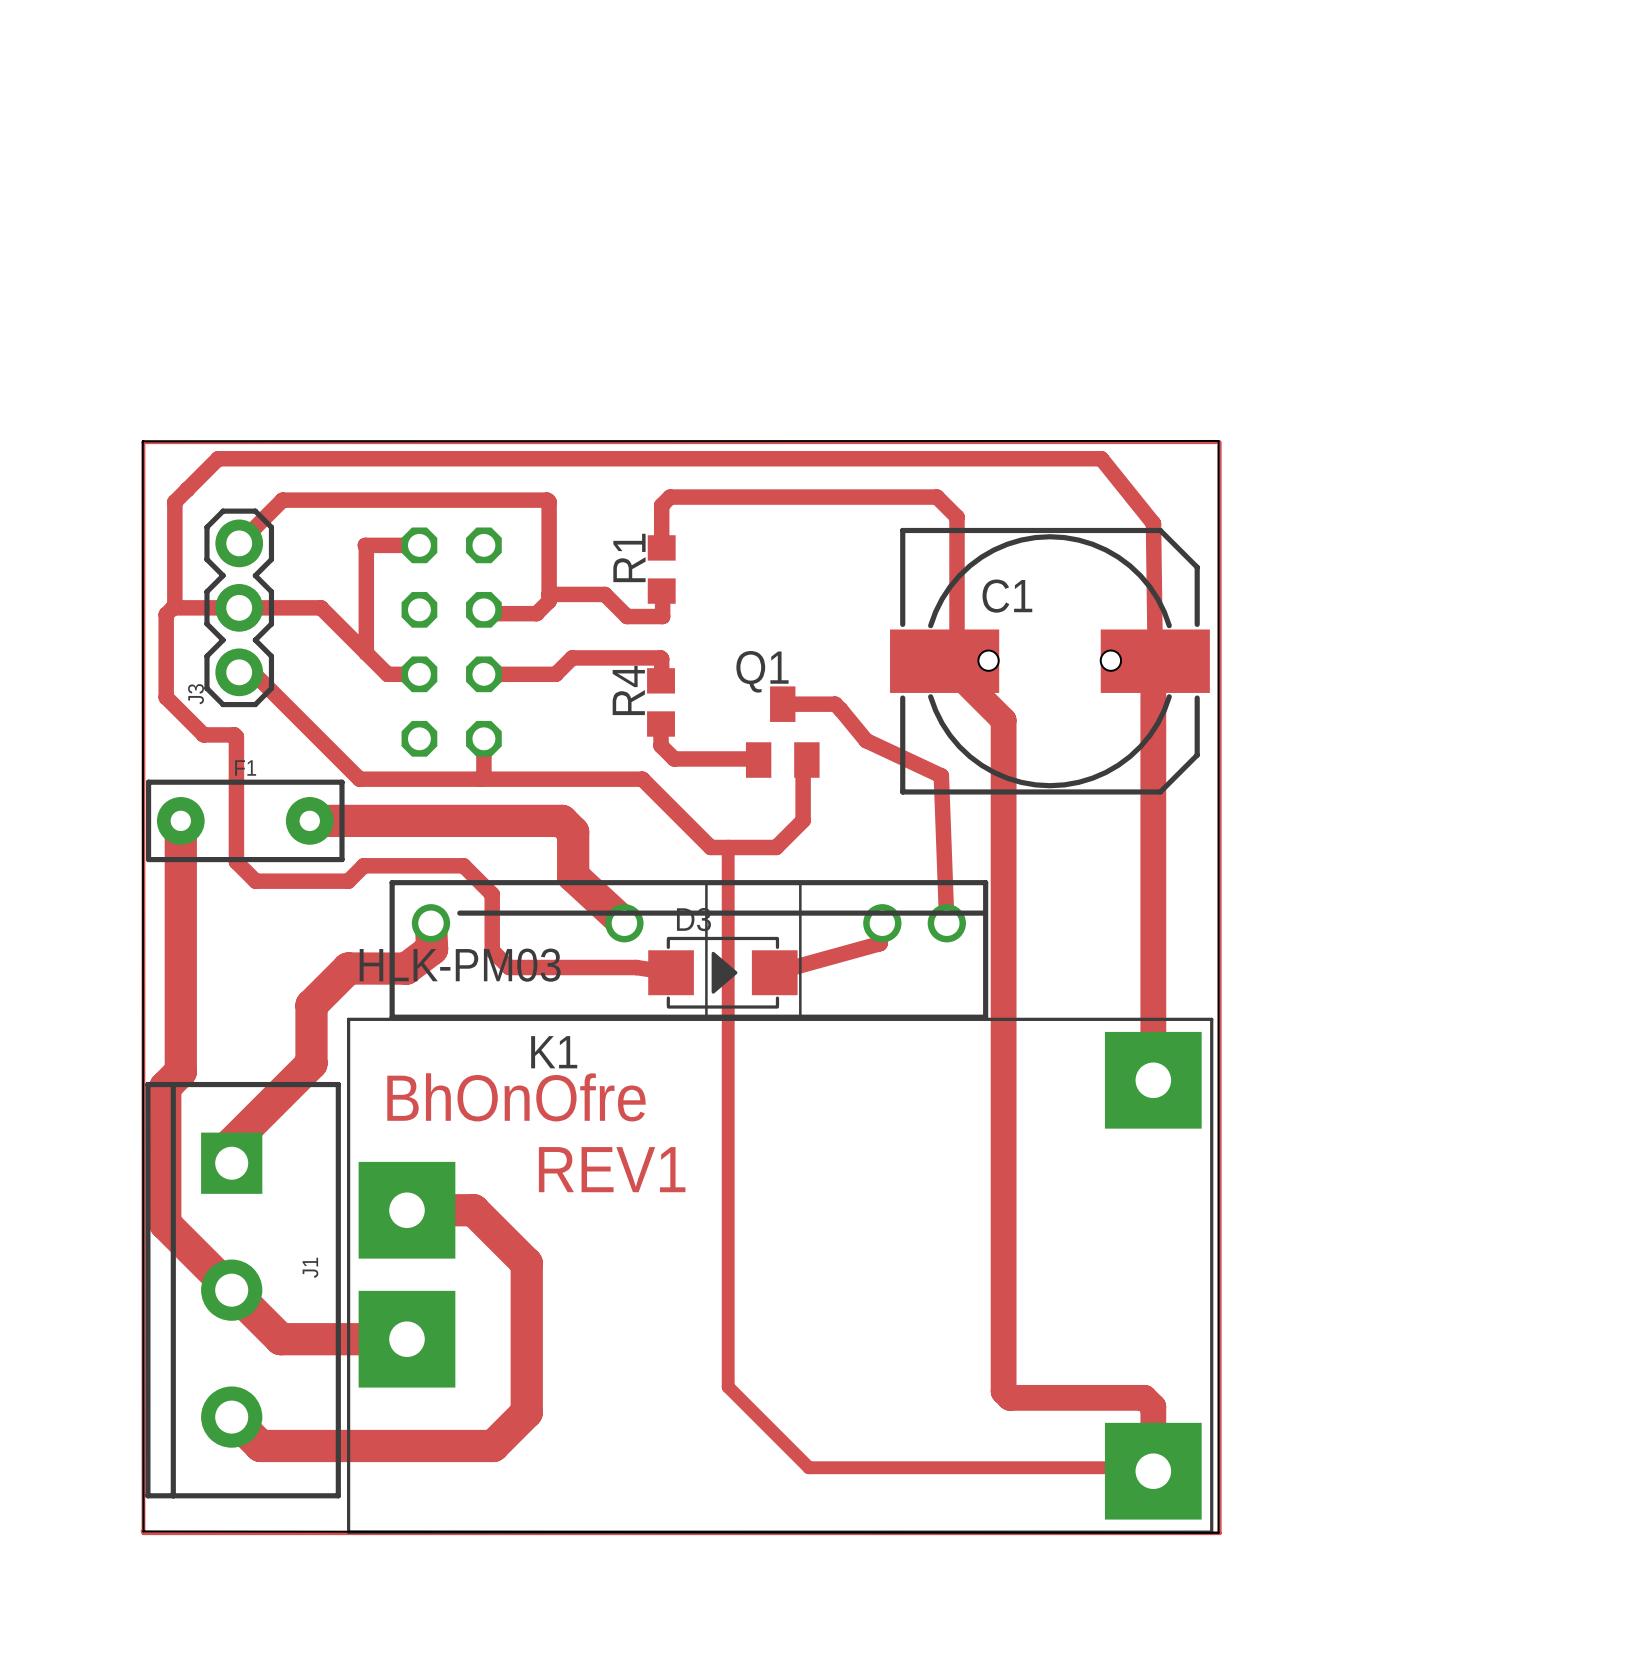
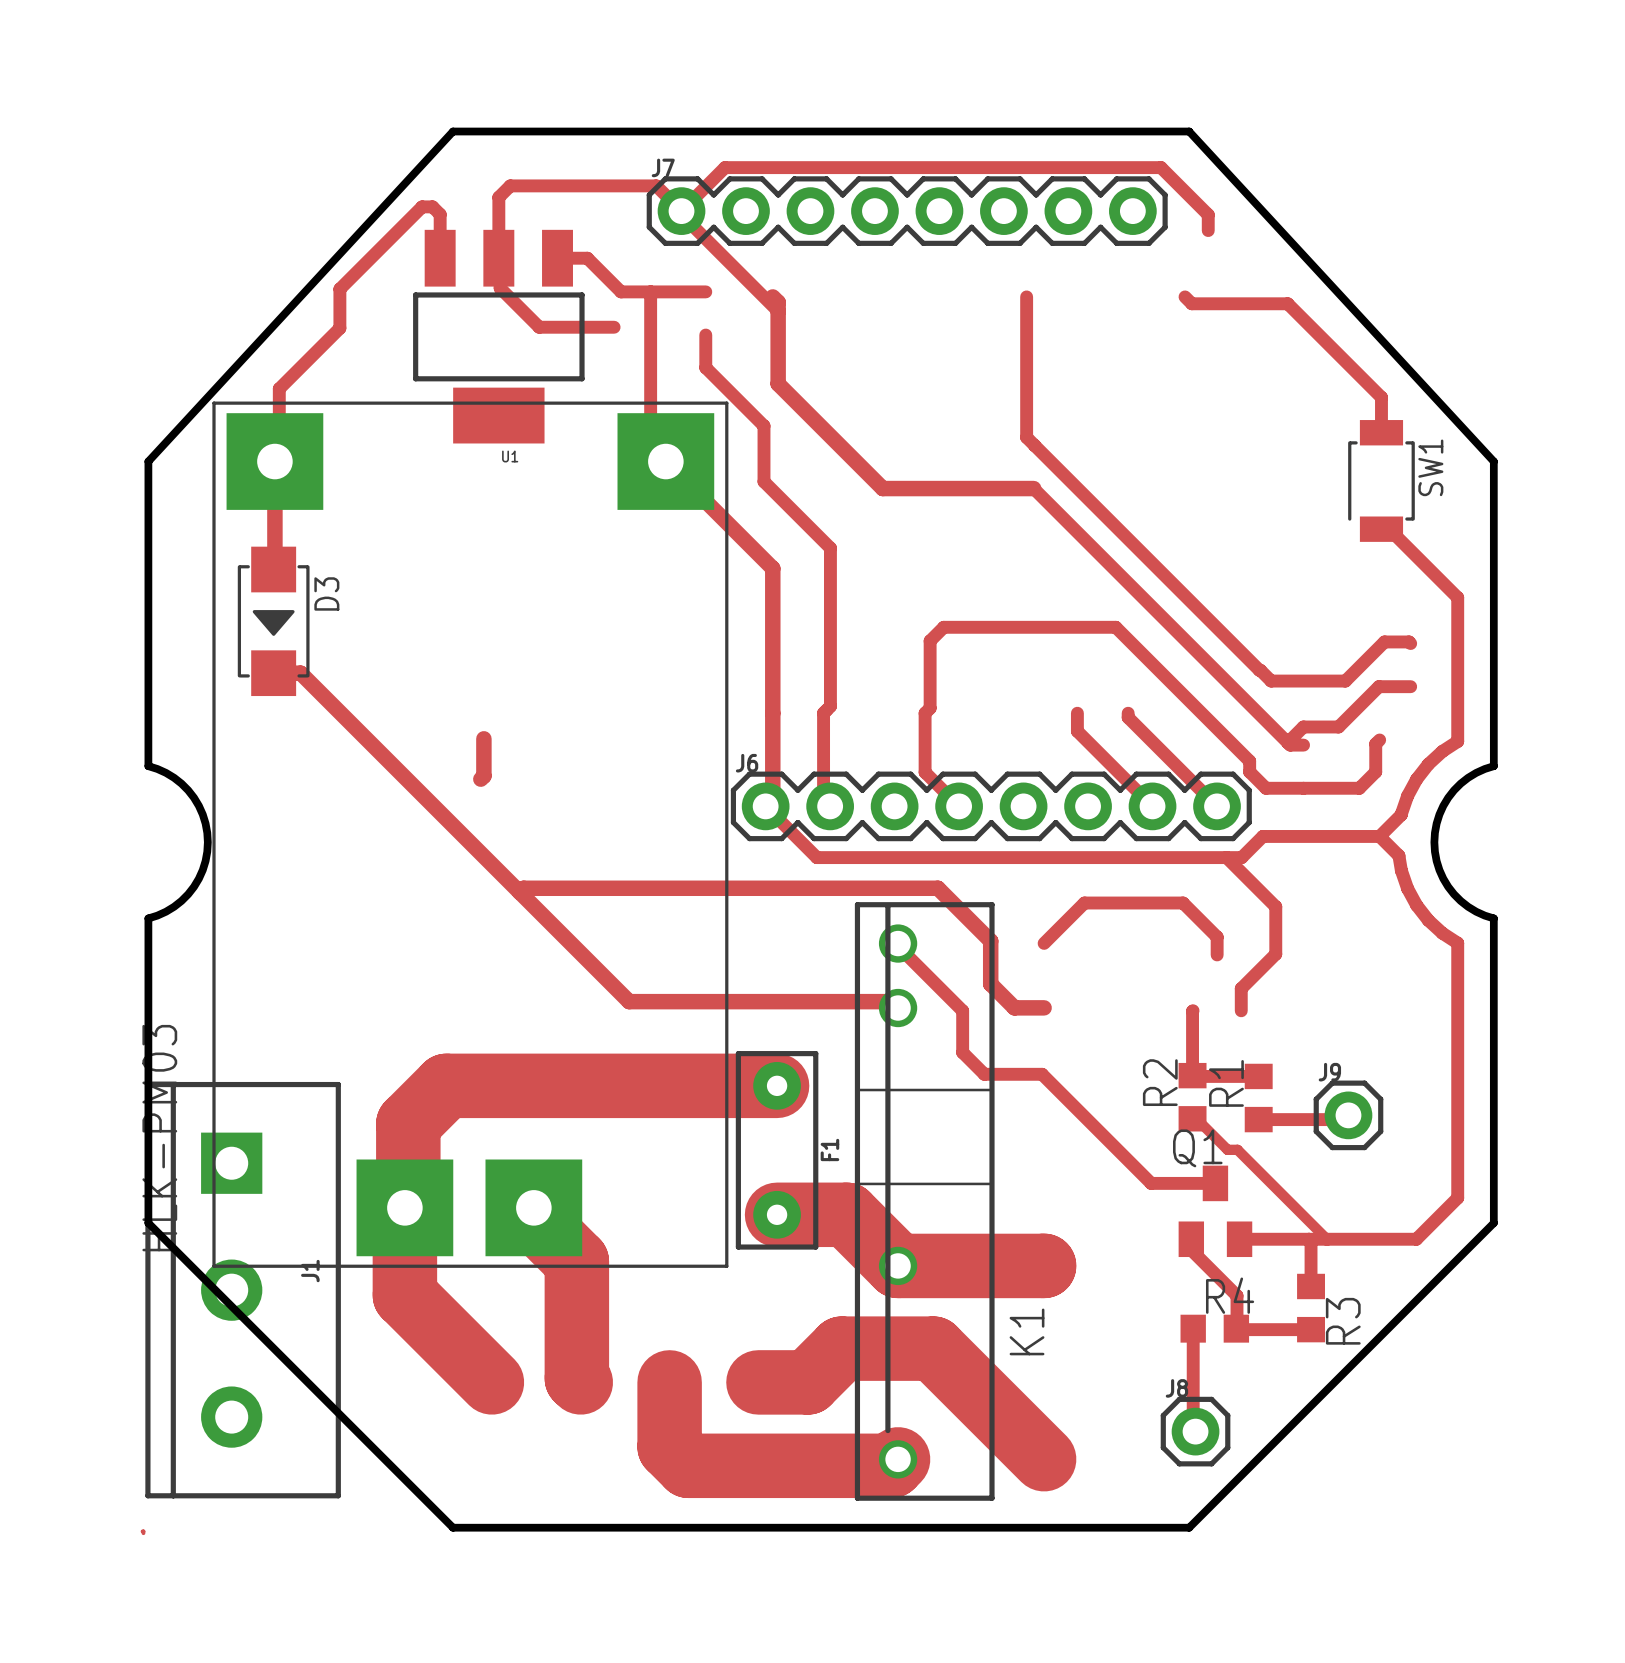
top track: none -> (681, 211) (725, 167) (1161, 167) (1208, 214) (1208, 230)
top track: none -> (681, 211) (681, 214) (778, 311)
top track: none -> (681, 211) (656, 185) (510, 185) (498, 197) (500, 288) (539, 327) (614, 327)
J7: none -> (907, 211)
top track: none -> (440, 258) (440, 214) (432, 206) (422, 206) (339, 289) (339, 328) (279, 388) (279, 457) (274, 461) (273, 569)
top track: none -> (557, 258) (587, 258) (621, 291) (705, 291)
top track: none -> (650, 291) (650, 441) (648, 443)
top track: none -> (772, 296) (778, 302) (778, 383) (882, 488) (1033, 488) (1290, 745) (1303, 745)
top track: none -> (1026, 296) (1026, 437) (1271, 681) (1345, 681) (1384, 641) (1410, 643)
top track: none -> (1185, 296) (1191, 303) (1287, 303) (1381, 397) (1381, 432)
top track: none -> (705, 335) (705, 367) (764, 425) (764, 481) (830, 548) (830, 706) (823, 713) (823, 799) (830, 806)
U1: none -> (498, 336)
board edge: (1218, 440) (1218, 1532) (143, 1531) (142, 441) (1218, 440) -> (453, 131) (148, 461) (148, 766) (174, 777) (194, 797) (202, 814) (207, 842) (202, 870) (194, 886) (174, 906) (148, 918) (148, 1223) (453, 1527) (1189, 1527) (1493, 1223) (1493, 918) (1468, 906) (1454, 894) (1439, 870) (1434, 842) (1439, 814) (1454, 790) (1468, 777) (1493, 766) (1493, 461) (1189, 131) (453, 131)
top track: (1216, 442) (143, 442) (143, 1531) -> none
top track: (1219, 442) (1219, 1533) (143, 1533) -> none
top track: none -> (681, 446) (665, 461) (772, 568) (772, 799) (765, 806) (816, 857) (1241, 857) (1262, 836) (1379, 836)
SW1: none -> (1381, 480)
top track: none -> (1381, 529) (1389, 529) (1457, 597) (1457, 741) (1442, 751) (1428, 764) (1416, 779) (1407, 796) (1401, 814) (1379, 836)
top track: (239, 543) (282, 500) (547, 500) (549, 502) (549, 601) (536, 613) (487, 613) (483, 609) -> none
top track: (419, 545) (365, 545) (366, 653) -> none
top track: (661, 547) (661, 505) (670, 497) (937, 497) (957, 517) (957, 648) (944, 661) (1003, 720) (1003, 1391) (1009, 1397) (1144, 1397) (1153, 1406) (1153, 1471) (1149, 1467) (808, 1467) (728, 1386) (728, 847) -> none
R1 position: (661, 569) -> (1258, 1098)
top track: (661, 591) (662, 616) (627, 616) (604, 594) (549, 594) -> none
top track: (172, 607) (321, 607) (387, 674) (419, 674) -> none
J3: (239, 607) -> none
part: (451, 642) -> none
hole: (988, 660) -> none
hole: (1110, 660) -> none
C1: (1049, 661) -> none
top track: (1155, 661) (1153, 523) (1101, 458) (218, 458) (174, 502) (174, 605) (166, 614) (166, 697) (203, 734) (234, 734) (236, 736) (236, 861) (255, 881) (348, 881) (363, 865) (463, 865) (492, 894) (492, 950) (509, 967) (636, 967) (671, 972) -> none
top track: (1155, 661) (1153, 663) (1153, 1080) -> none
top track: (239, 672) (252, 672) (359, 779) (642, 779) (710, 847) (776, 847) (803, 820) (803, 763) (806, 760) -> none
top track: none -> (273, 673) (300, 673) (629, 1001) (891, 1001) (898, 1008)
top track: (483, 674) (555, 674) (572, 657) (660, 657) (661, 680) -> none
top track: none -> (1410, 686) (1378, 686) (1338, 726) (1303, 726) (1287, 742)
R4 rotation: 0° (661, 702) -> 90° clockwise (1214, 1328)
R4 position: (661, 702) -> (1214, 1328)
top track: (782, 704) (835, 704) (866, 740) (941, 775) (946, 923) -> none
top track: none -> (1077, 713) (1077, 731) (1152, 806)
top track: none -> (1128, 713) (1128, 717) (1217, 806)
top track: (661, 724) (661, 745) (674, 758) (758, 760) -> none
Q1 position: (782, 732) -> (1215, 1211)
top track: none -> (1379, 739) (1375, 743) (1375, 771) (1359, 788) (1265, 788) (1249, 771) (1249, 761) (1115, 627) (943, 627) (930, 640) (930, 708) (925, 713) (925, 772) (959, 806)
J6: none -> (991, 806)
top track: (180, 820) (180, 1071) (165, 1087) (165, 1223) (280, 1339) (406, 1339) -> none
F1 rotation: 0° (245, 820) -> 90° clockwise (777, 1150)
F1 position: (245, 820) -> (777, 1150)
top track: (309, 820) (561, 820) (573, 832) (573, 876) (624, 923) -> none
top track: none -> (1379, 836) (1398, 855) (1407, 888) (1416, 905) (1428, 920) (1442, 933) (1457, 943) (1457, 1197) (1416, 1239) (1239, 1239)
top track: none -> (1226, 857) (1275, 906) (1275, 954) (1241, 988) (1241, 1010)
top track: none -> (519, 892) (523, 888) (937, 888) (990, 941) (990, 984) (1014, 1007) (1044, 1007)
top track: (430, 923) (432, 949) (406, 968) (348, 968) (311, 1005) (311, 1063) (231, 1143) (231, 1163) -> none
top track: (882, 923) (880, 943) (774, 972) -> none
top track: none -> (898, 943) (898, 946) (962, 1010) (962, 1052) (984, 1074) (1042, 1074) (1151, 1183) (1215, 1183)
top track: none -> (1044, 943) (1084, 903) (1183, 903) (1217, 937) (1217, 954)
K1 rotation: 0° (688, 949) -> 90° counterclockwise (924, 1201)
D3 rotation: 0° (722, 972) -> 90° clockwise (273, 621)
D3 position: (722, 972) -> (273, 621)
top track: none -> (1193, 1010) (1192, 1075) (1258, 1076)
top track: none -> (777, 1085) (446, 1085) (408, 1123) (408, 1204) (404, 1207) (404, 1295) (491, 1382)
text: BhOnOfre (516, 1097) -> none
R2: none -> (1192, 1097)
top track: none -> (1348, 1115) (1344, 1119) (1258, 1119)
J9: none -> (1348, 1115)
top track: none -> (1192, 1118) (1196, 1118) (1227, 1149) (1237, 1149) (1326, 1239)
text: REV1 (612, 1169) -> none
top track: none -> (533, 1207) (533, 1218) (576, 1261) (576, 1378) (580, 1382)
top track: (406, 1210) (473, 1210) (526, 1263) (526, 1412) (493, 1446) (260, 1446) (231, 1417) -> none
top track: none -> (777, 1214) (846, 1214) (898, 1265) (1043, 1265)
top track: none -> (1191, 1239) (1191, 1250) (1236, 1295) (1236, 1328)
top track: none -> (1308, 1239) (1311, 1241) (1311, 1286)
part rotation: 0° (780, 1275) -> 90° counterclockwise (470, 834)
part position: (780, 1275) -> (470, 834)
R3: none -> (1311, 1308)
top track: none -> (1236, 1326) (1239, 1329) (1311, 1329)
top track: none -> (1193, 1328) (1193, 1439) (1195, 1431)
top track: none -> (669, 1382) (669, 1446) (688, 1465) (891, 1465) (898, 1459)
top track: none -> (758, 1382) (807, 1382) (841, 1348) (933, 1348) (1044, 1459)
J8: none -> (1195, 1431)

